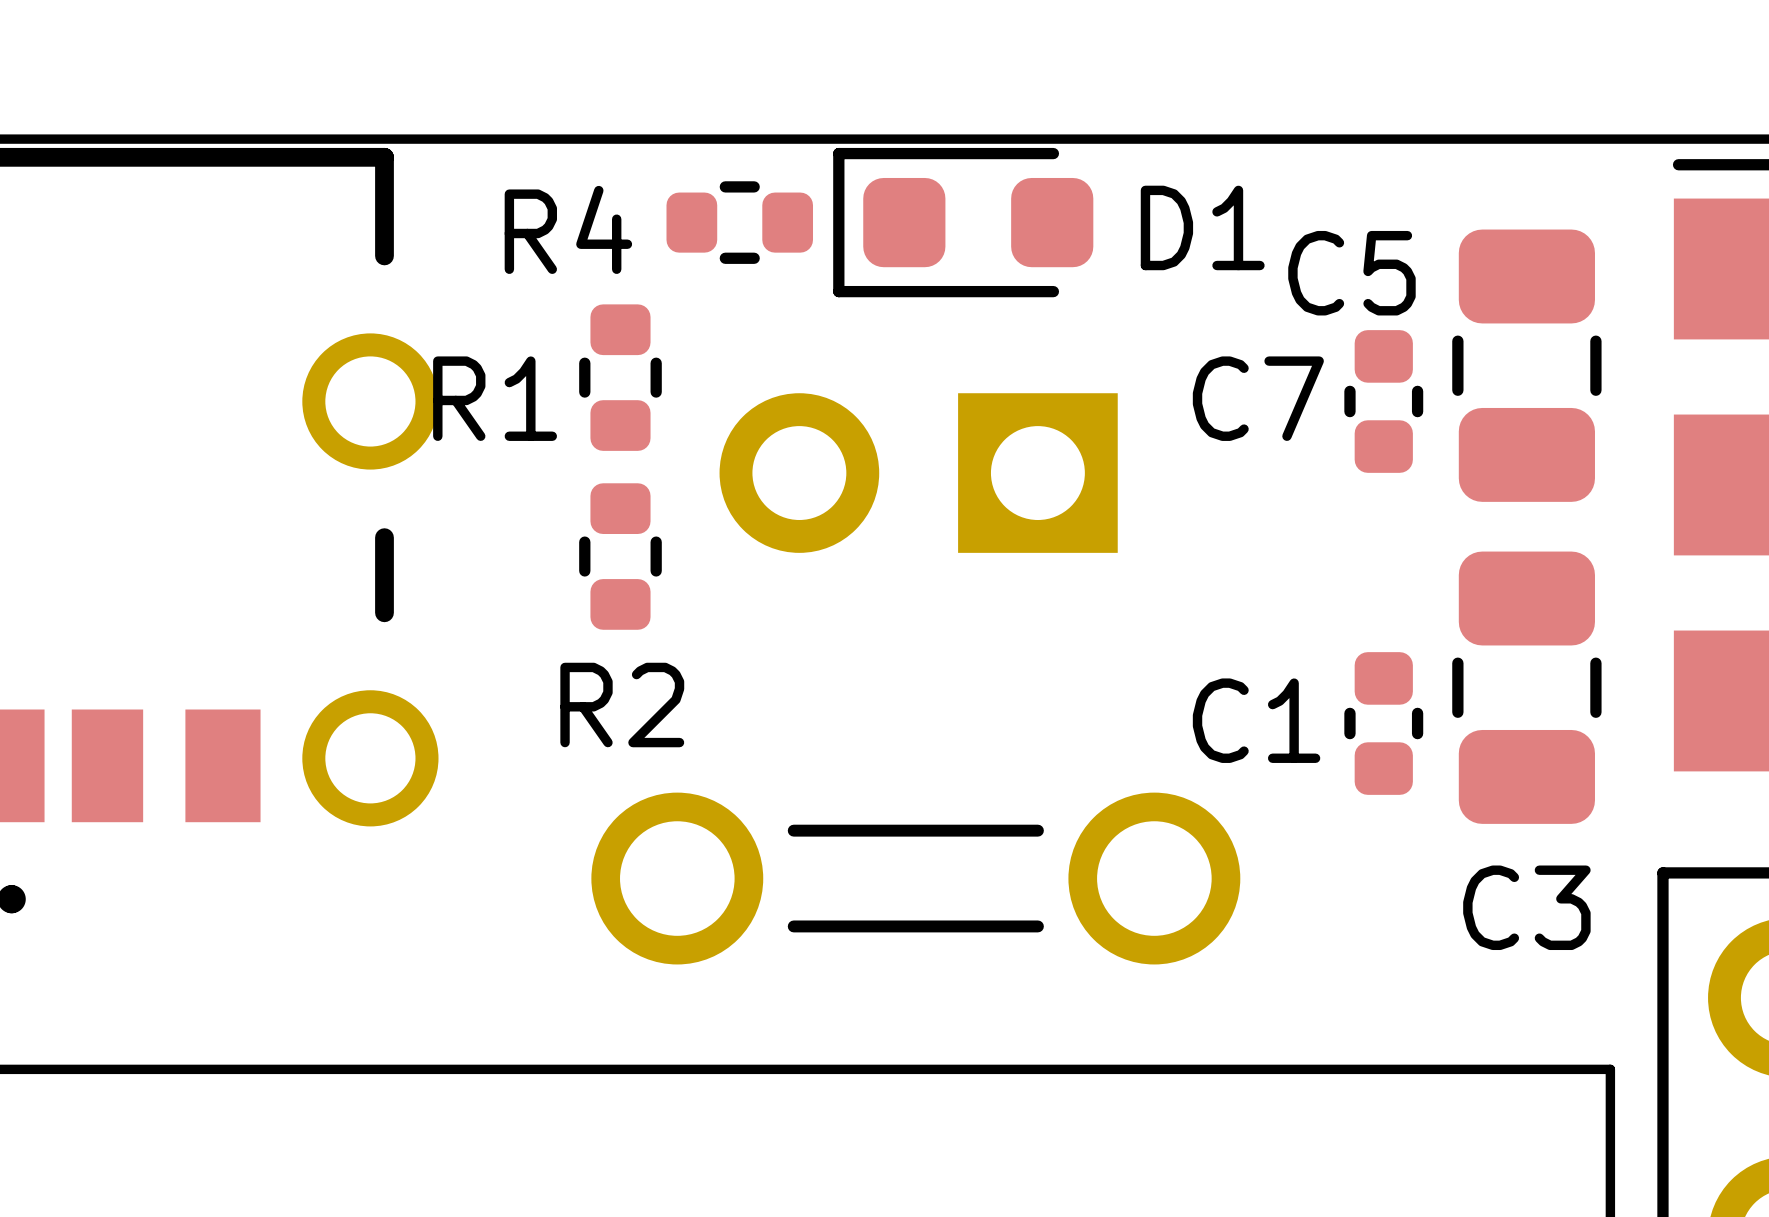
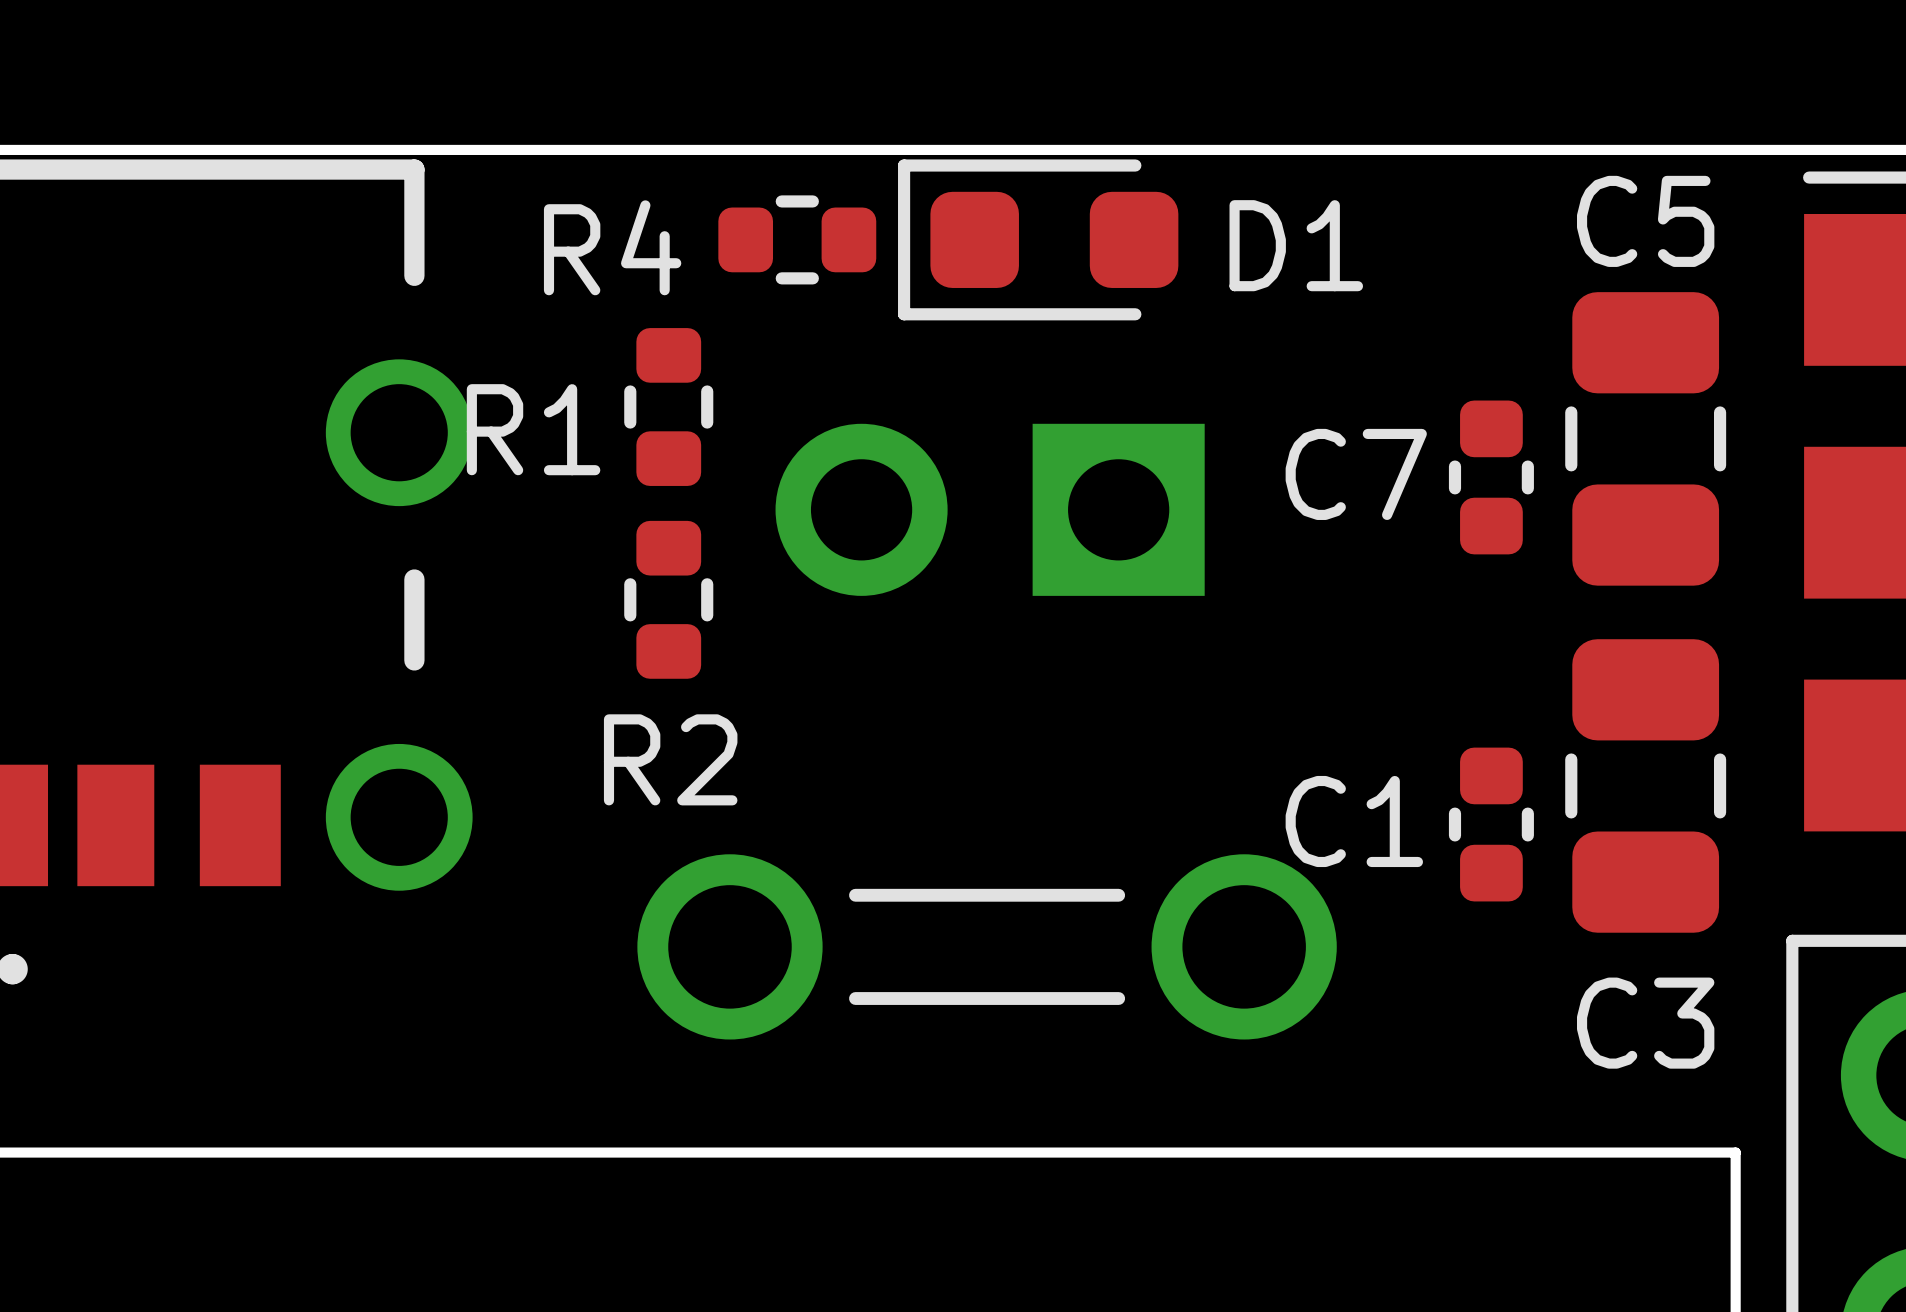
C5 name position: C5 (1351, 273) -> C5 (1645, 221)
C5 position: (1526, 365) -> (1645, 438)
C7 position: (1383, 401) -> (1491, 477)
C3 position: (1526, 687) -> (1645, 785)
C1 position: (1383, 723) -> (1491, 824)

